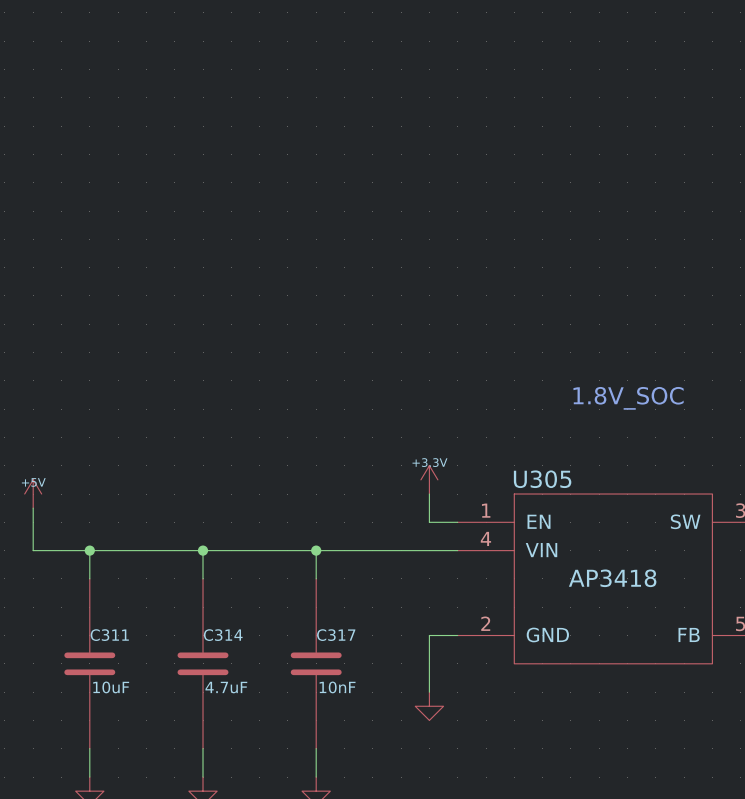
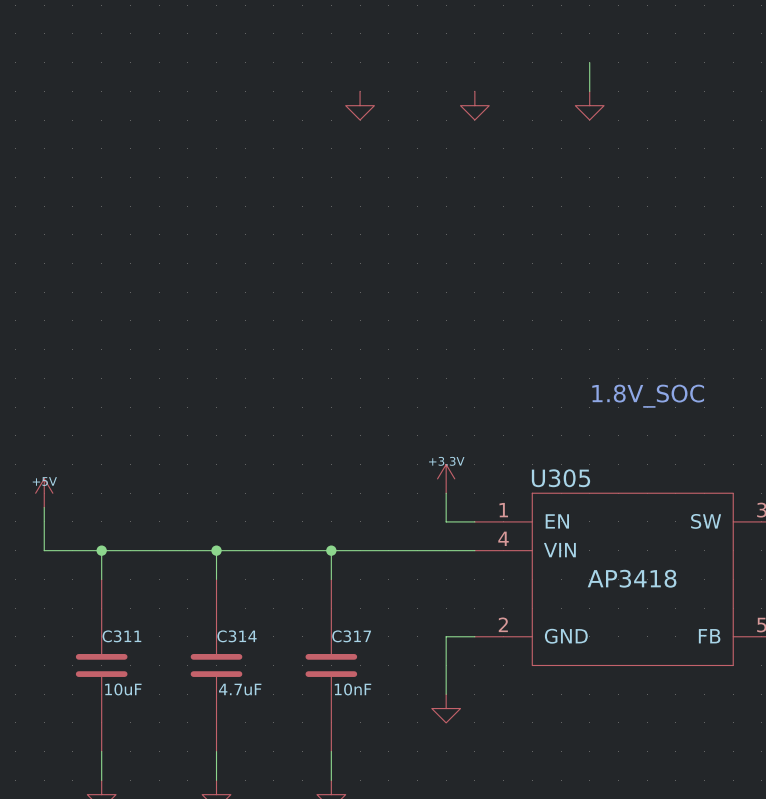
wire: none -> (589, 62) (589, 91)
power symbol: none -> (360, 105)
power symbol: none -> (474, 105)
power symbol: none -> (589, 105)

